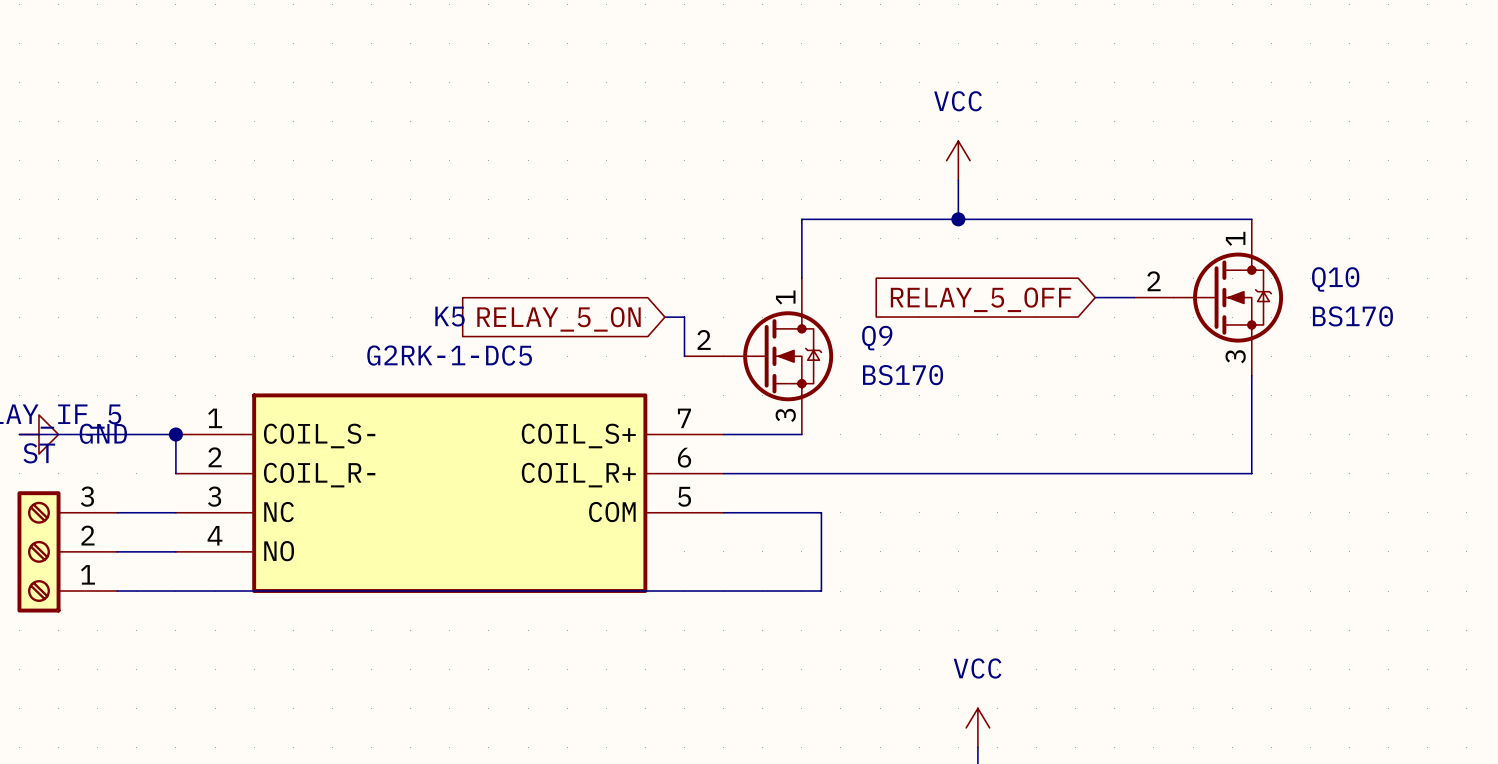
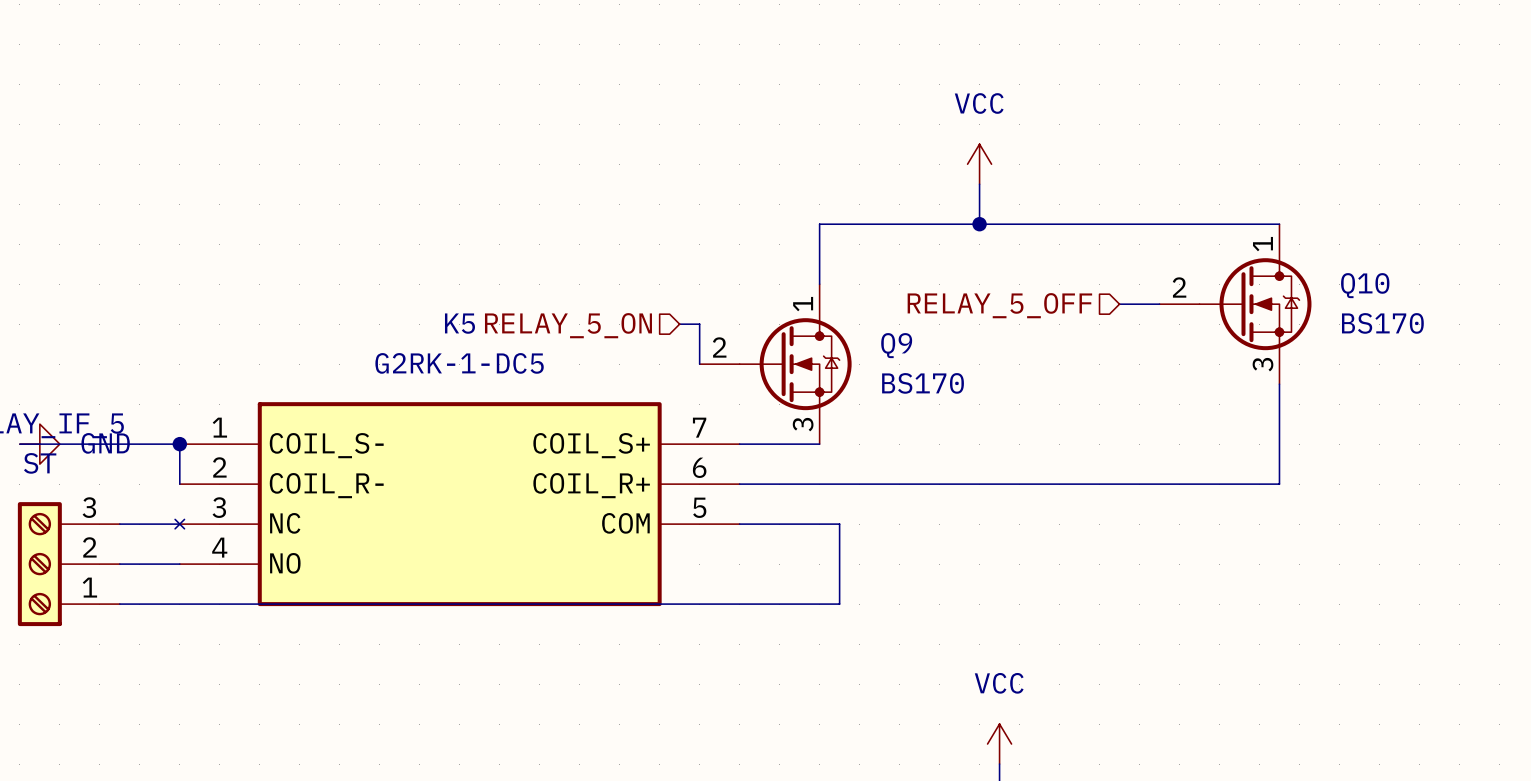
hierarchical label: none -> RELAY_5_OFF (999, 305)
global label: RELAY_5_OFF (981, 299) -> none
hierarchical label: none -> RELAY_5_ON (568, 325)
global label: RELAY_5_ON (559, 319) -> none
K5 symbol: [175, 393, 724, 593] -> [175, 402, 740, 607]

